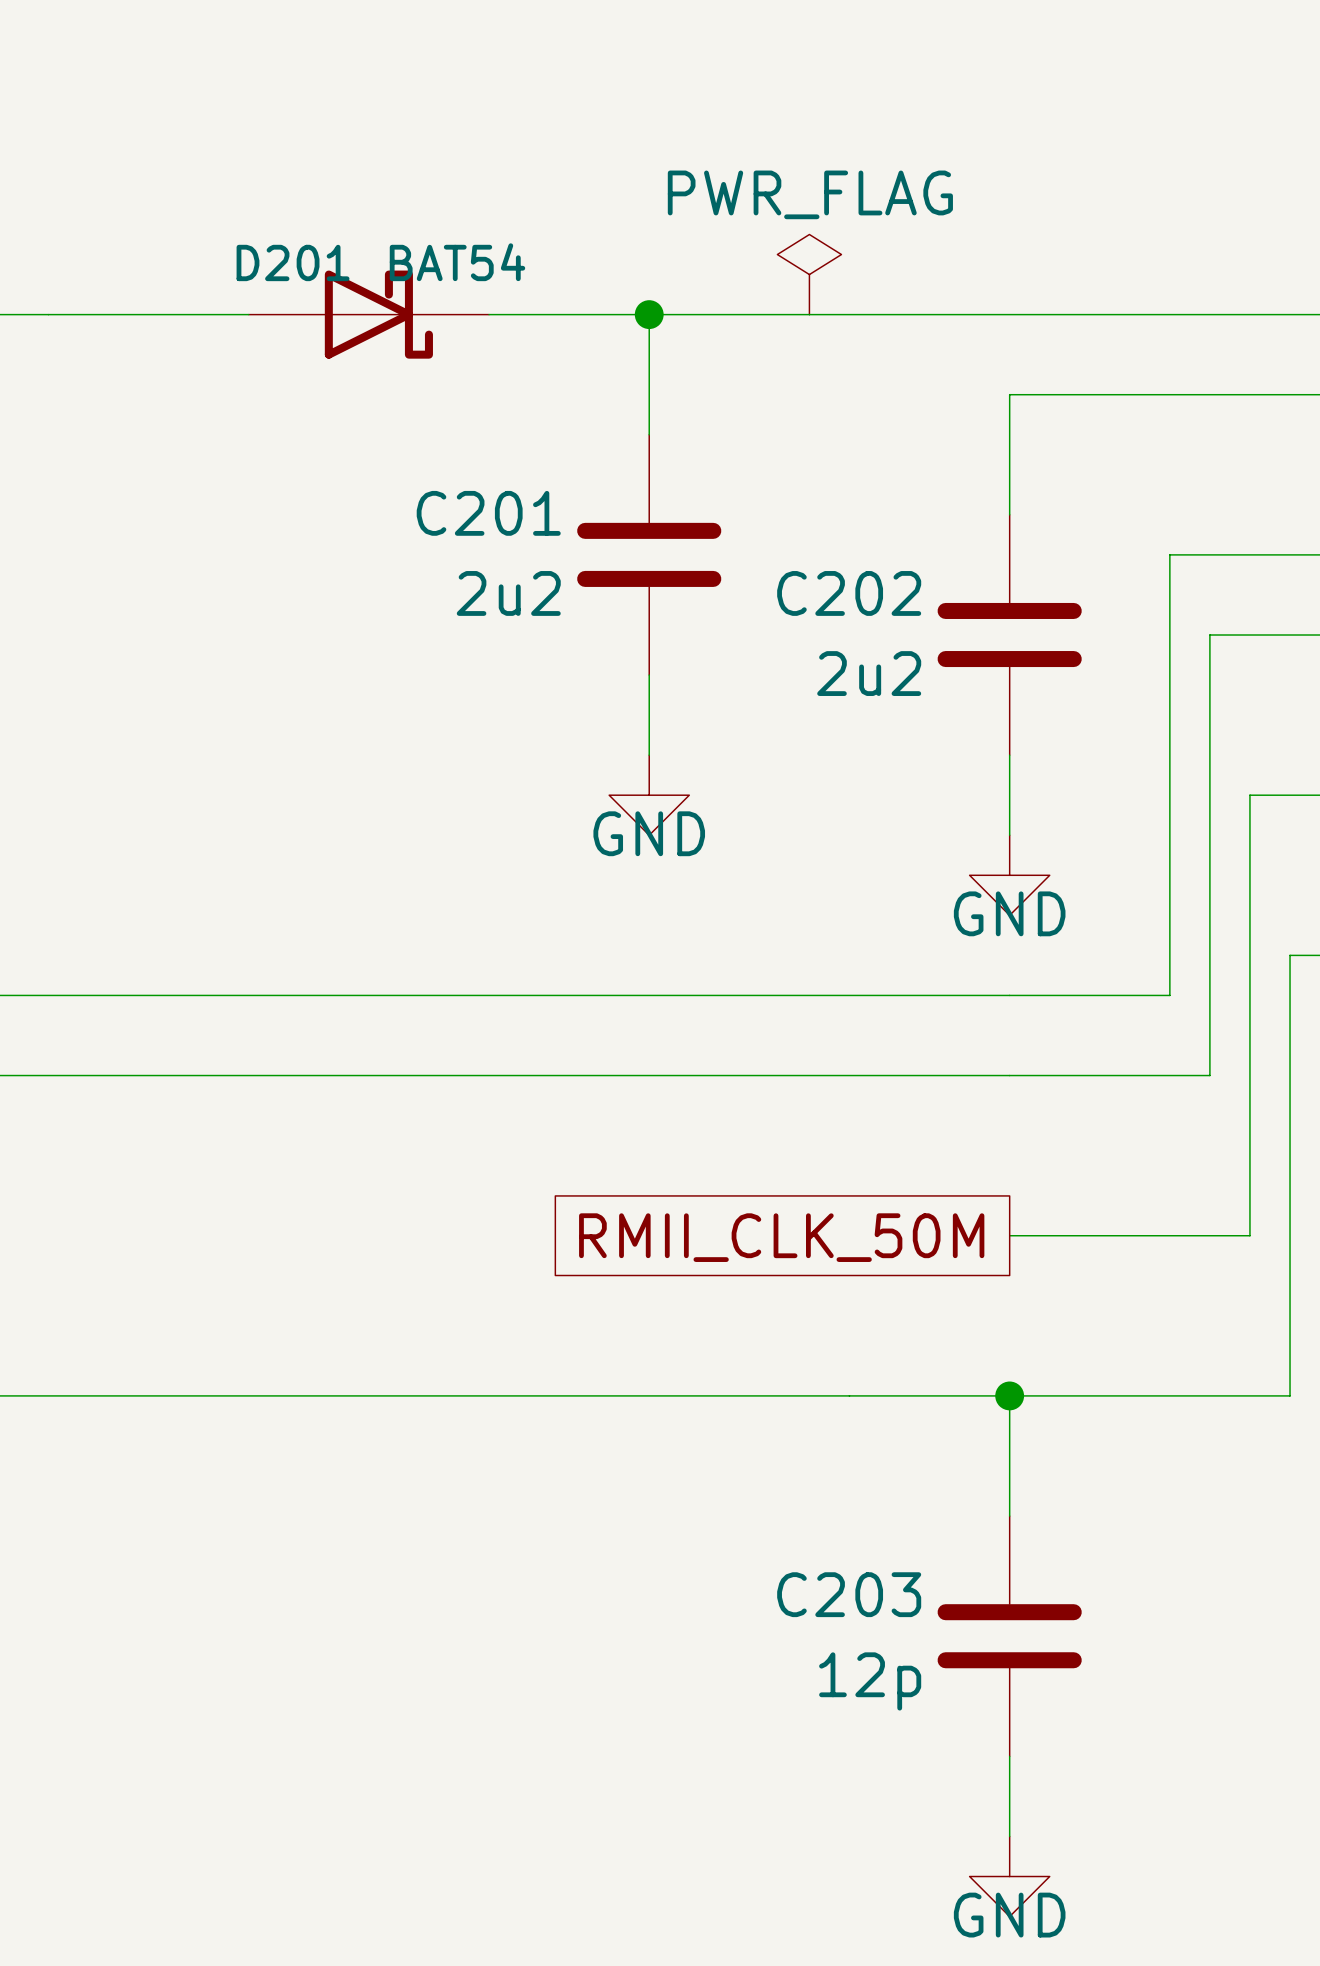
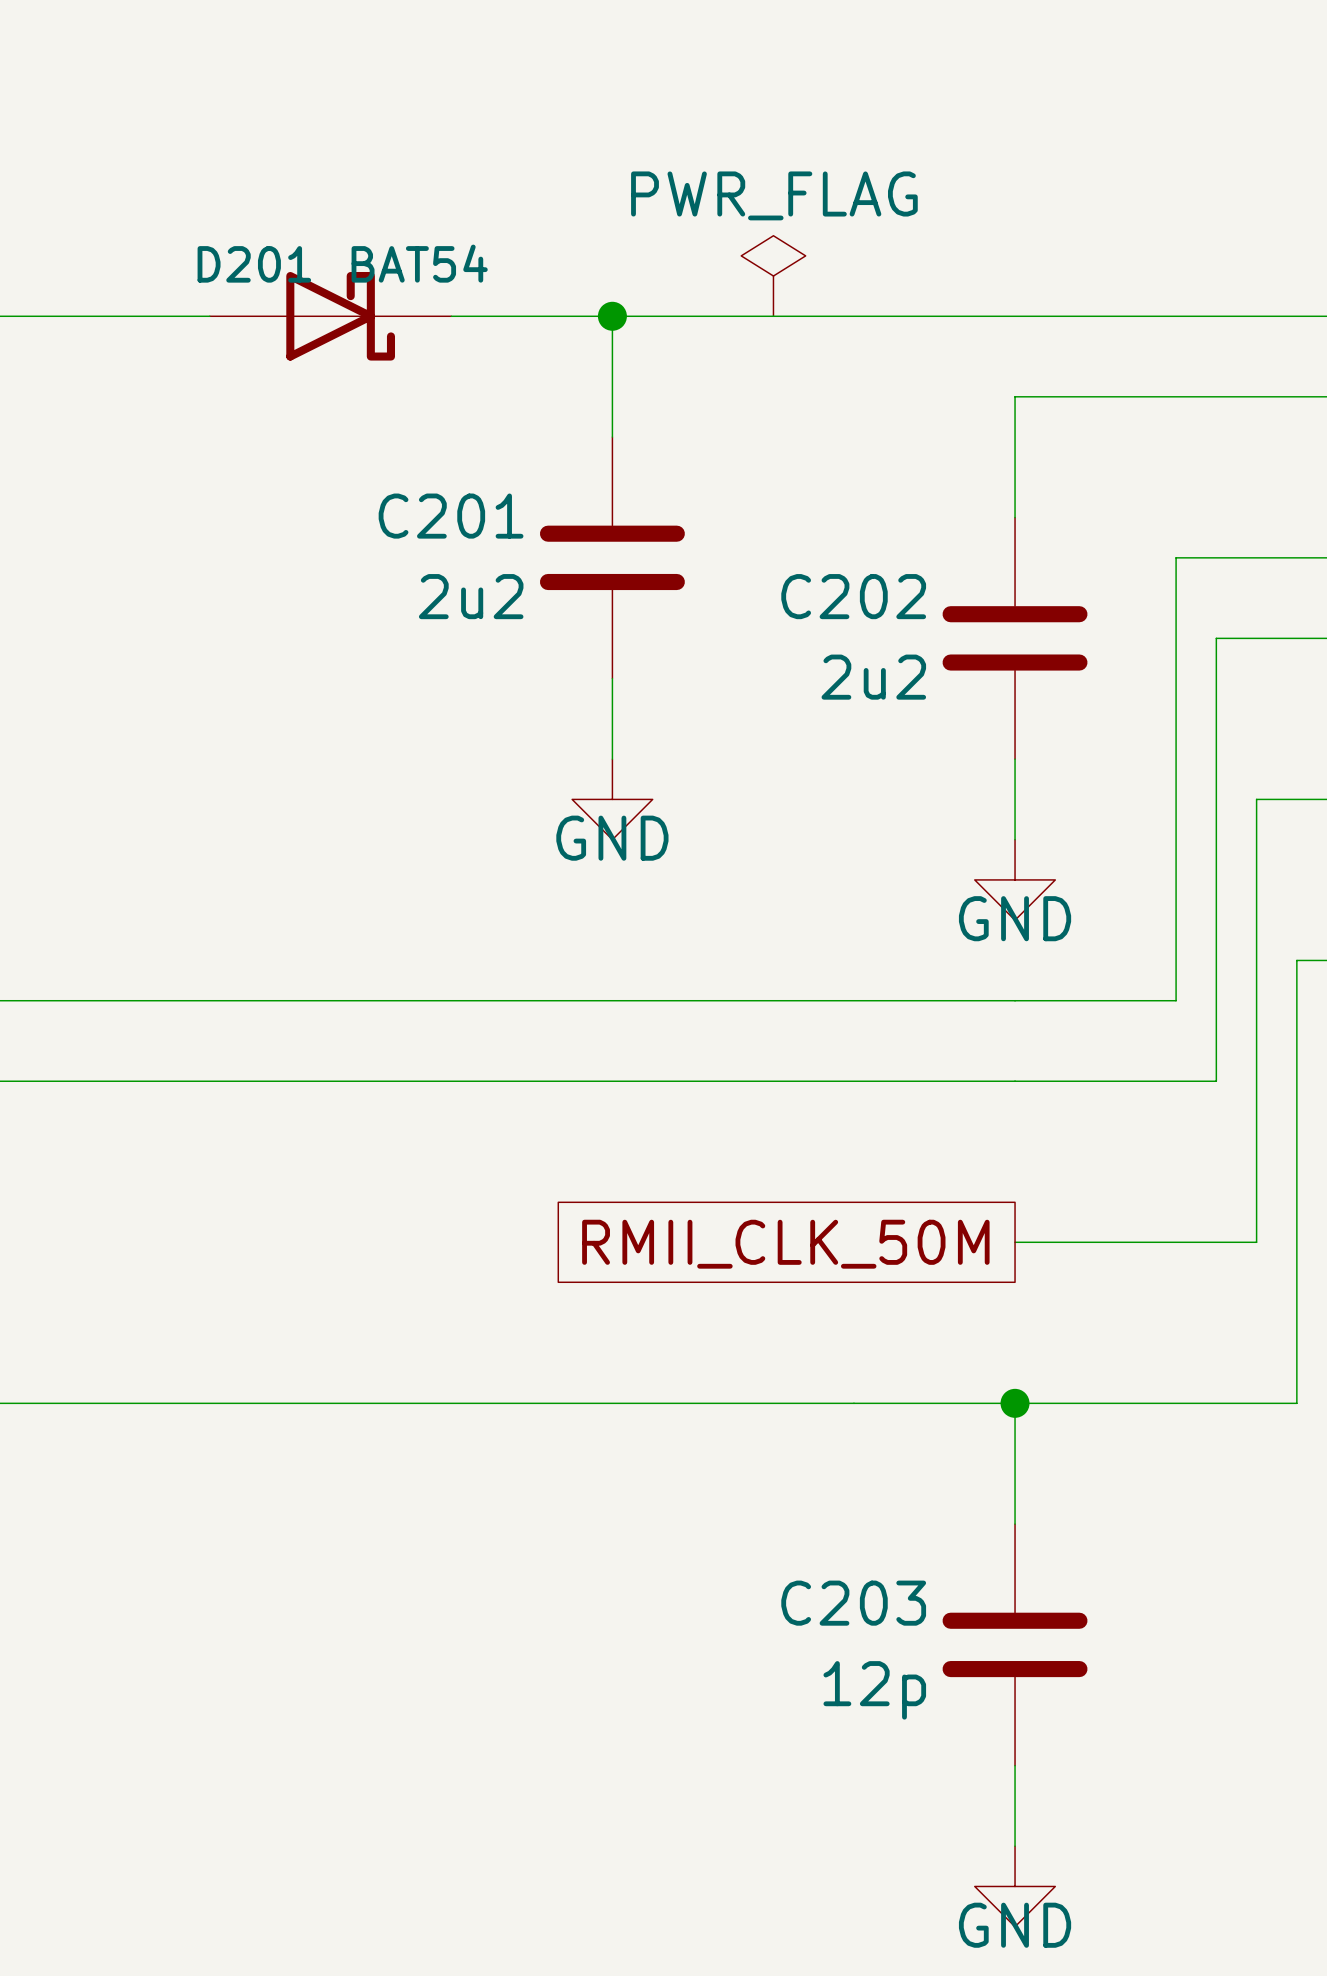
power symbol position: PWR_FLAG (809, 274) -> PWR_FLAG (773, 276)
D201 position: (368, 314) -> (330, 316)
wire: (649, 314) (649, 434) -> (612, 316) (612, 437)
junction position: (649, 314) -> (612, 316)
C201 position: (649, 554) -> (612, 557)
wire: (649, 675) (649, 755) -> (612, 678) (612, 759)
power symbol position: GND (649, 795) -> GND (612, 799)

